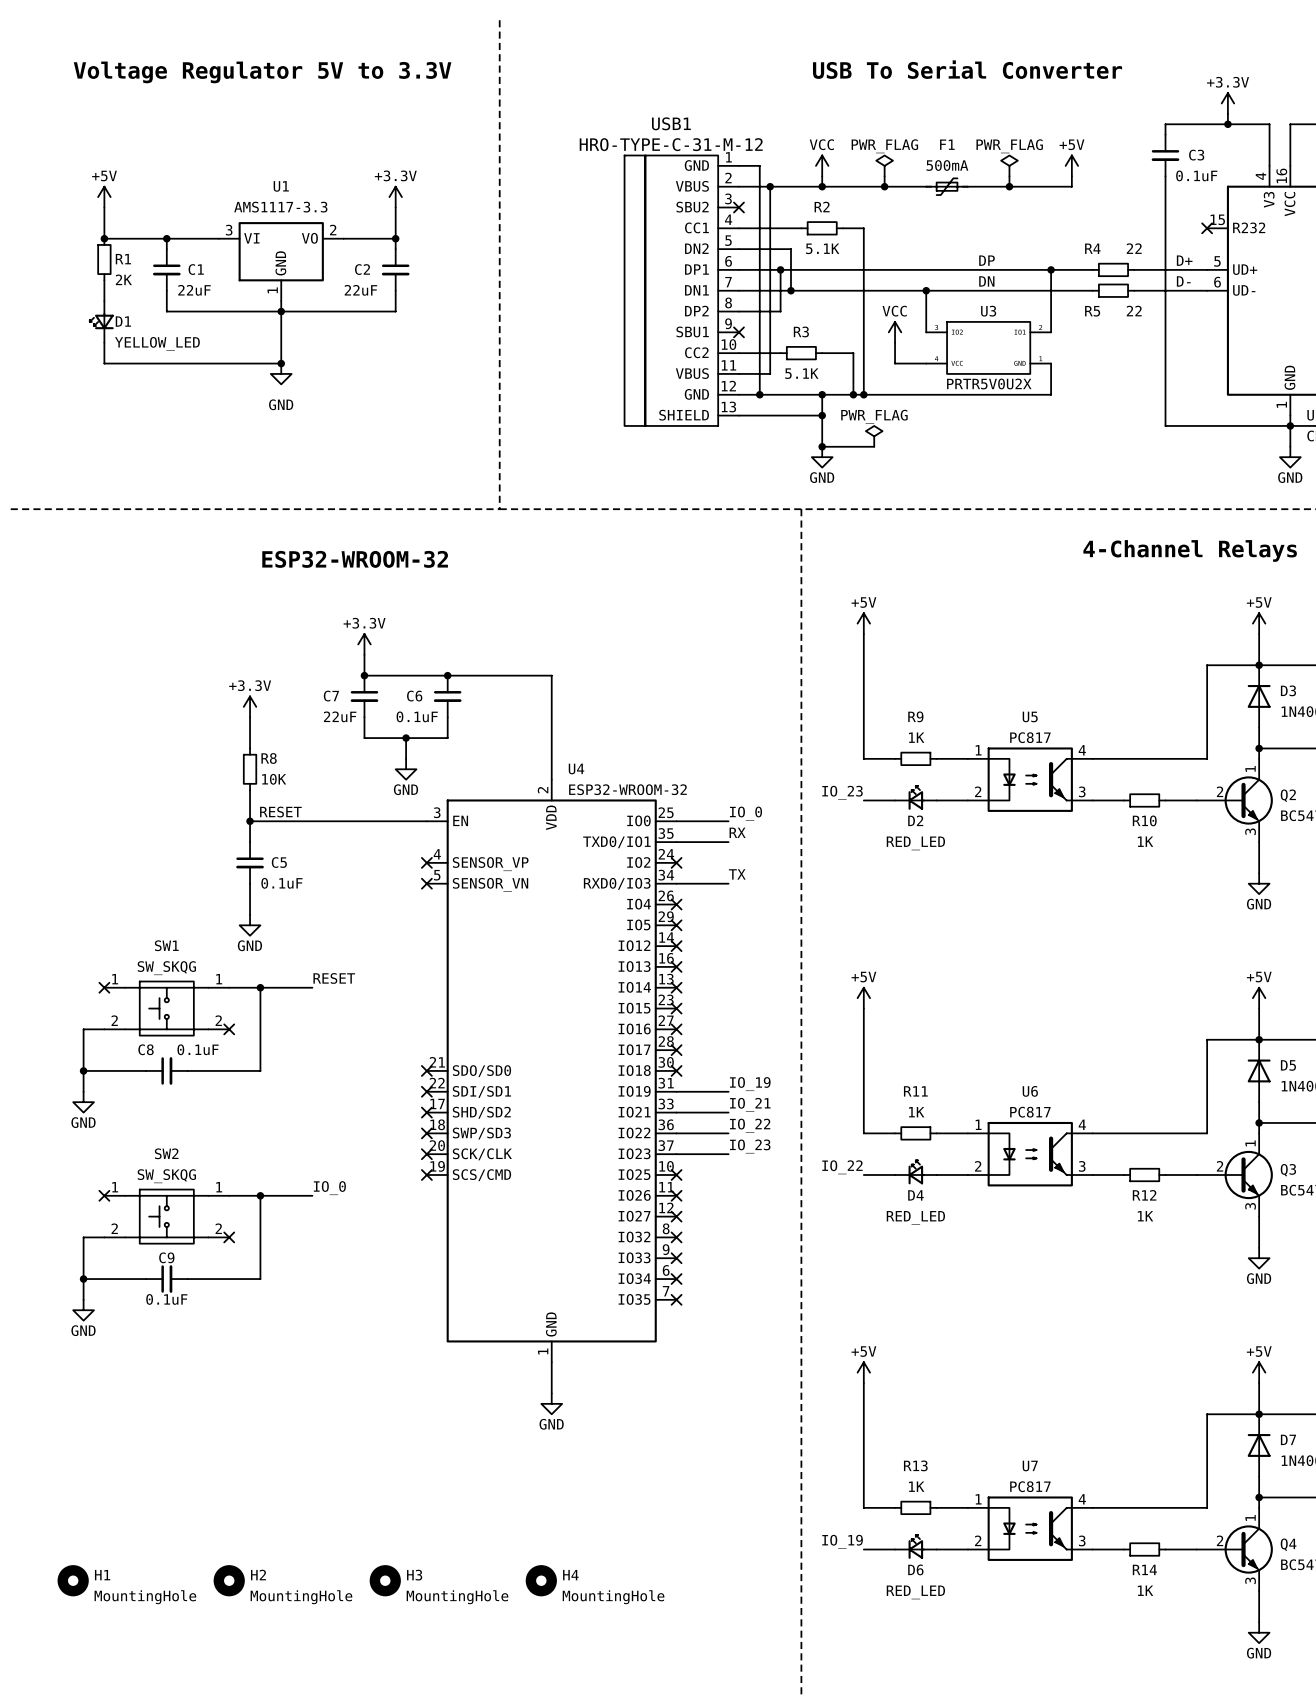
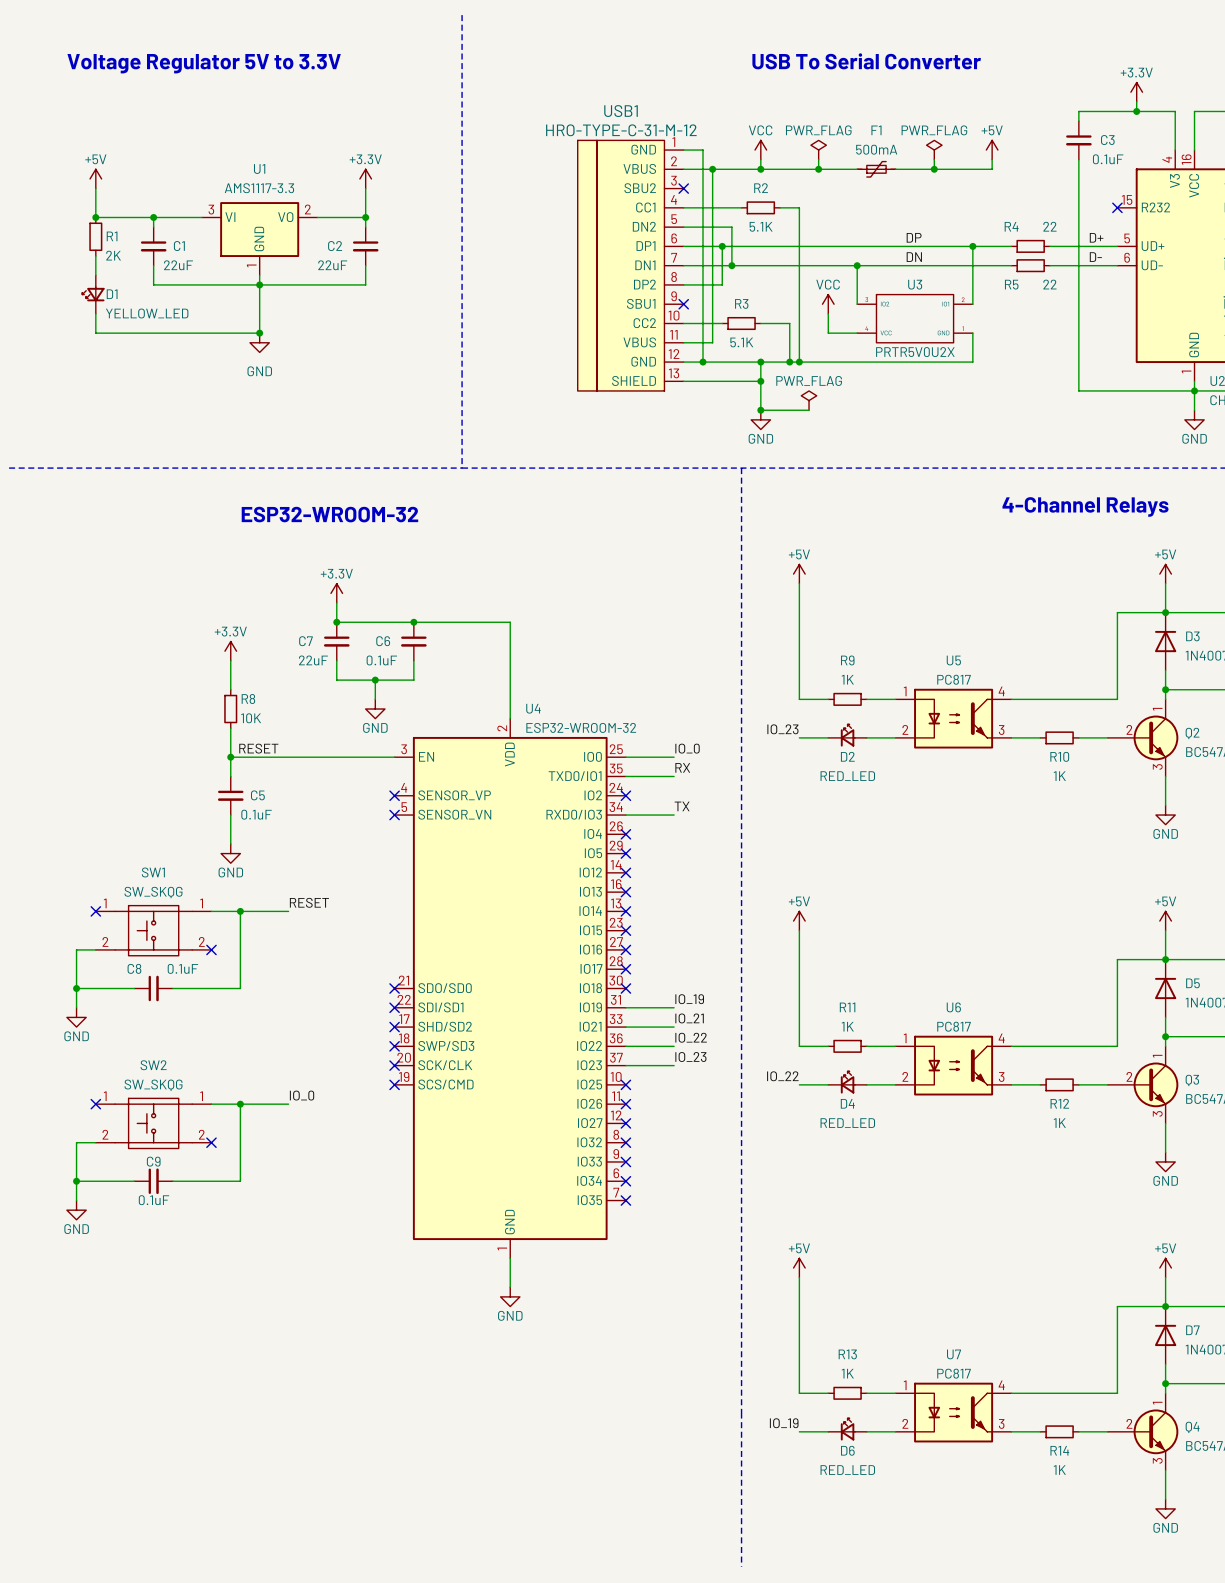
H1: MountingHole (73, 1580) -> none
H2: MountingHole (229, 1580) -> none
H3: MountingHole (385, 1580) -> none
H4: MountingHole (541, 1580) -> none

